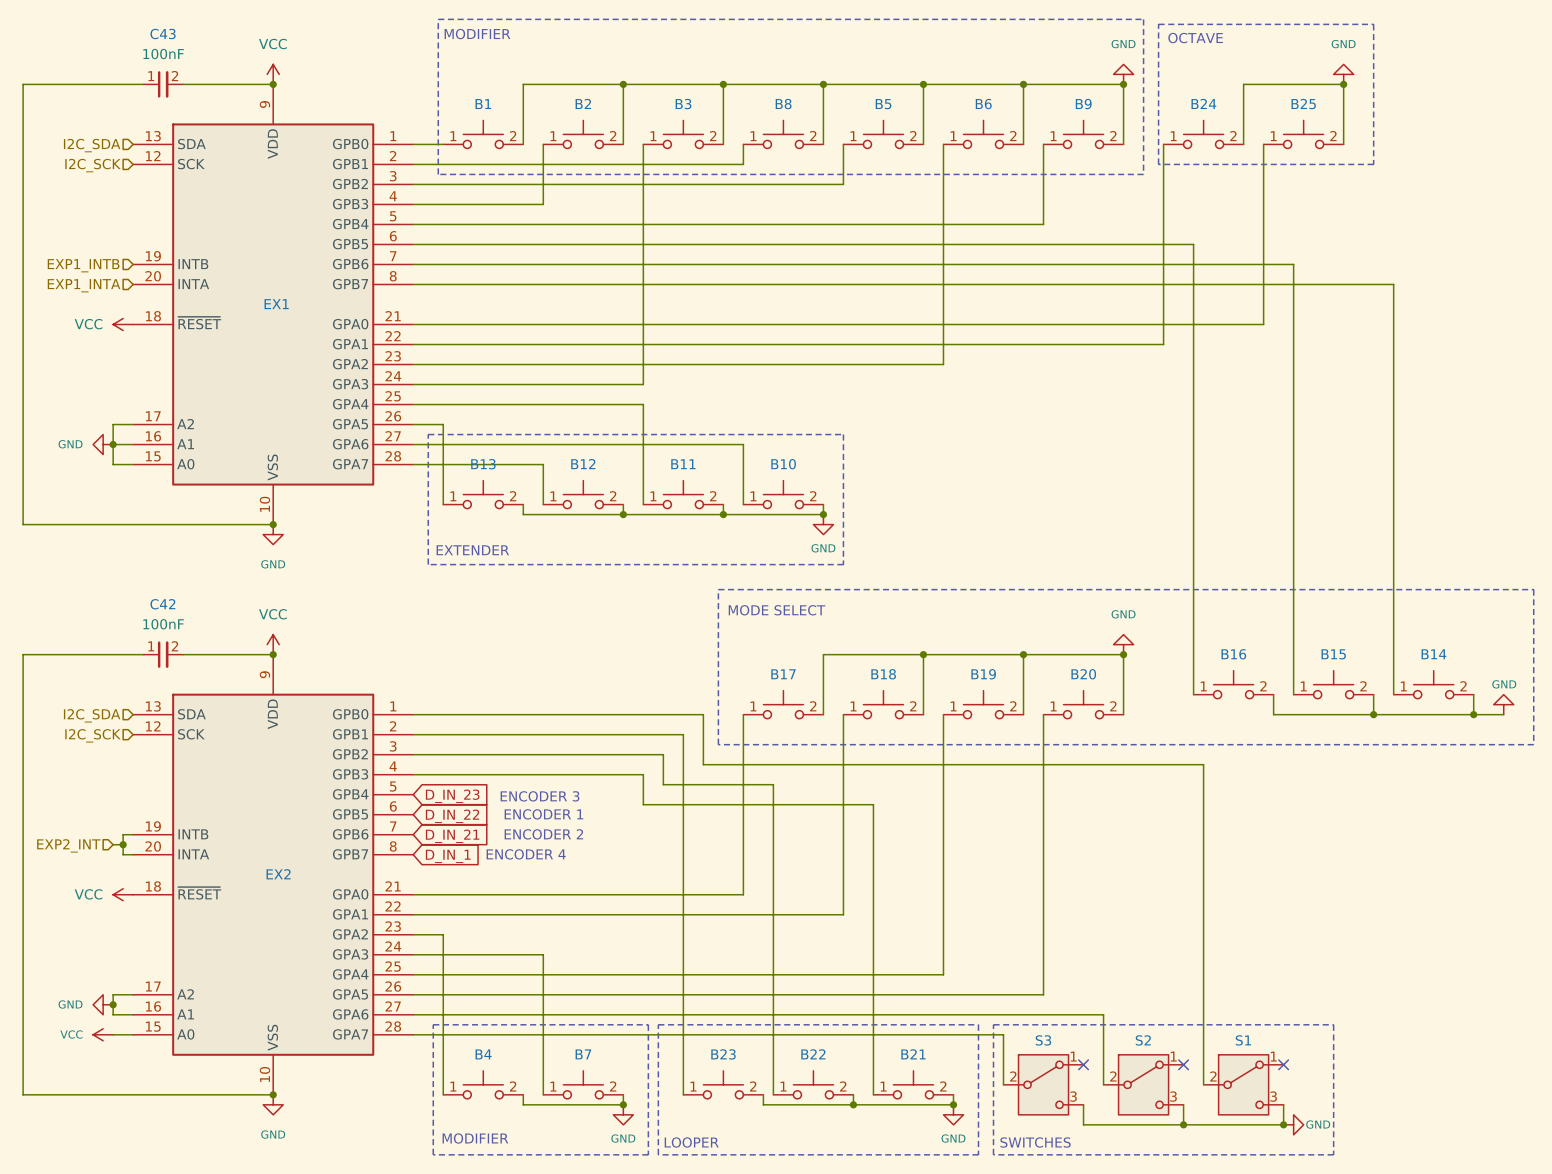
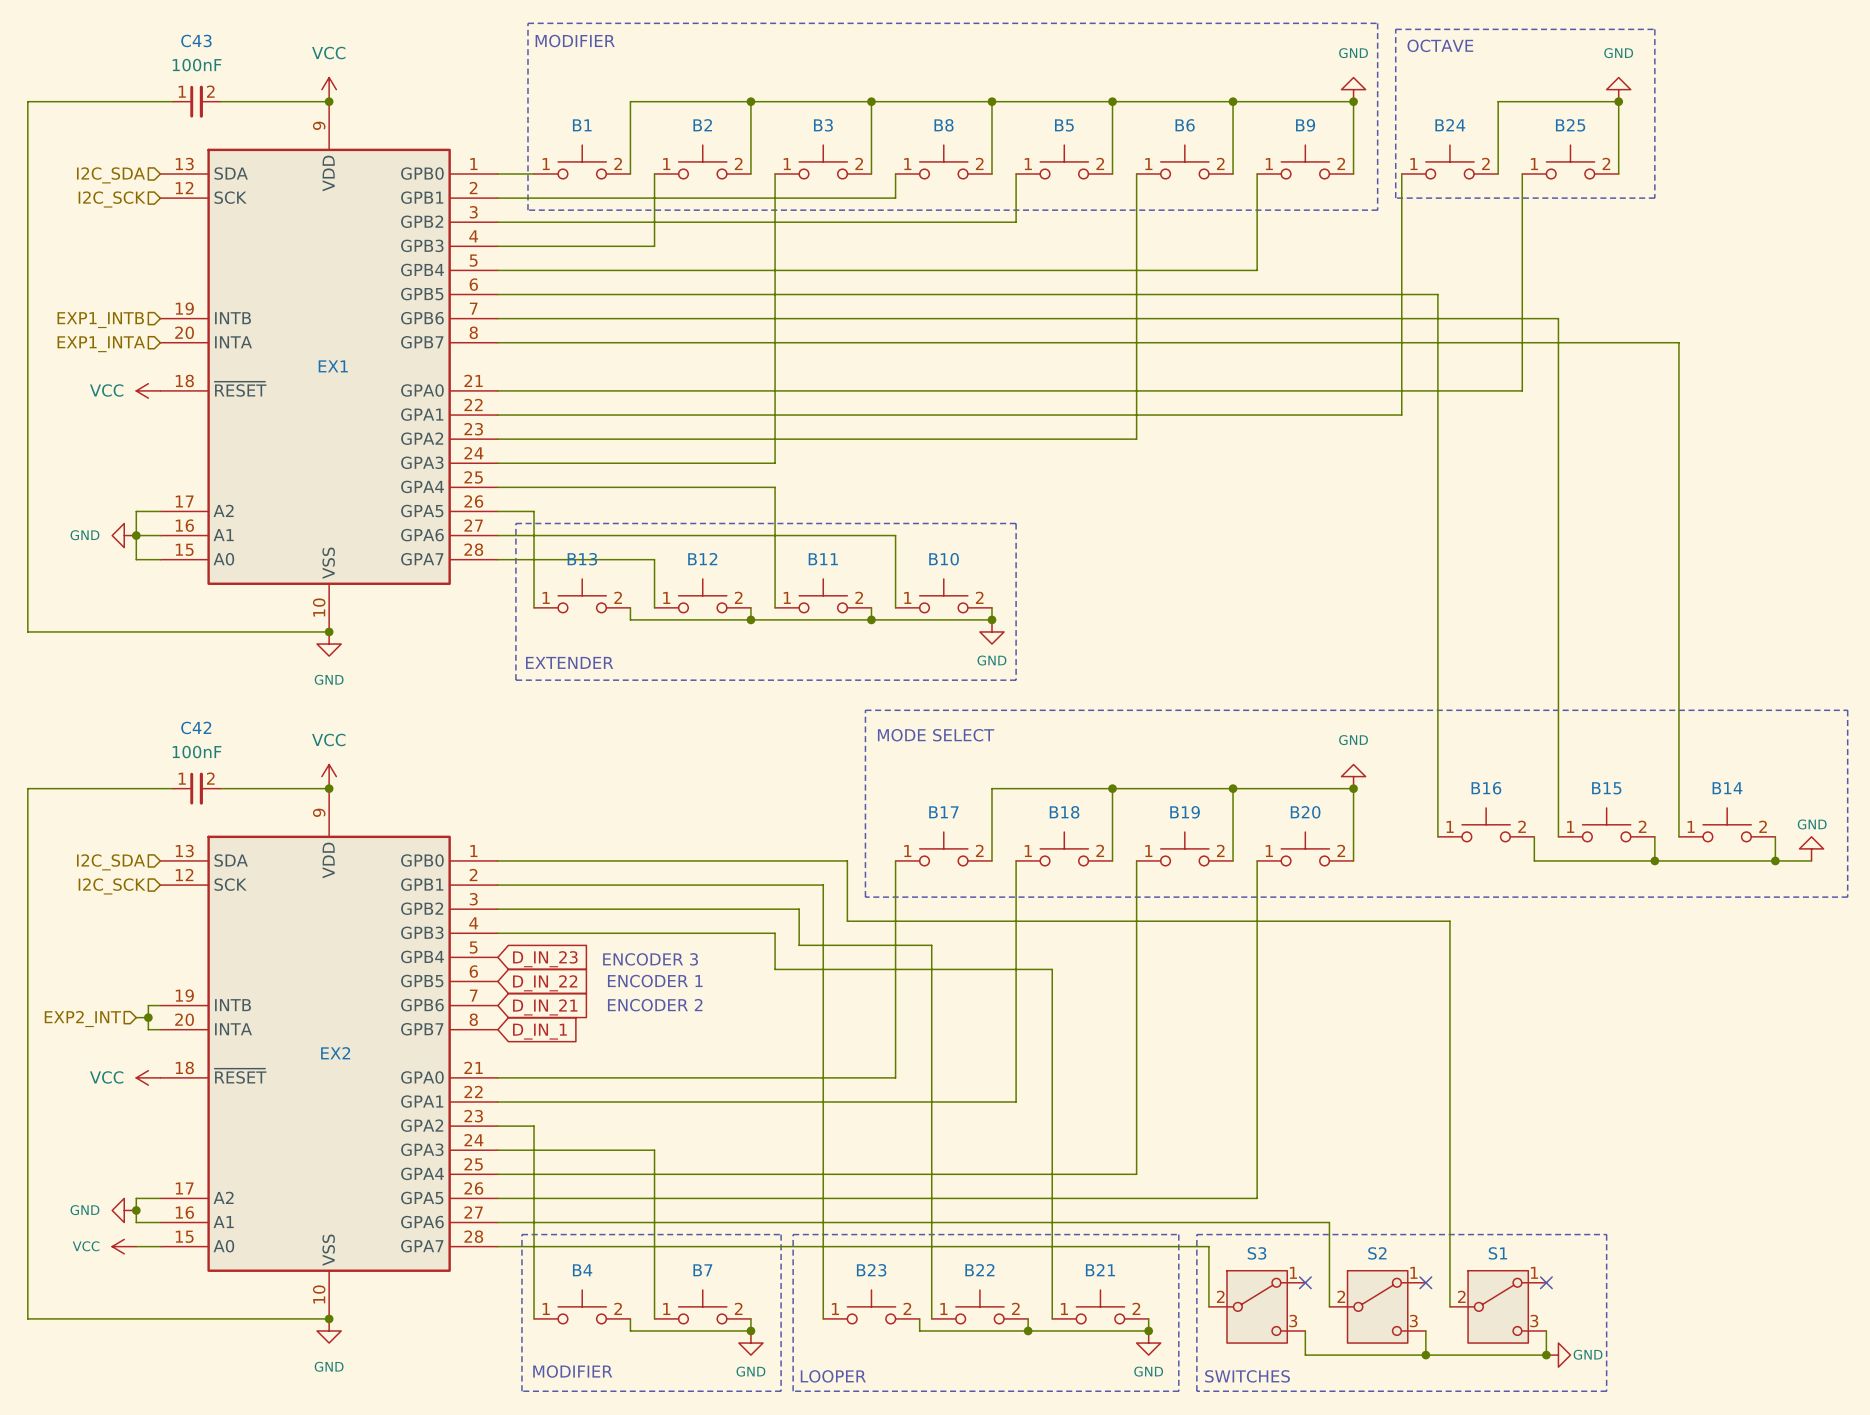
text: ENCODER 4 (526, 854) -> none

